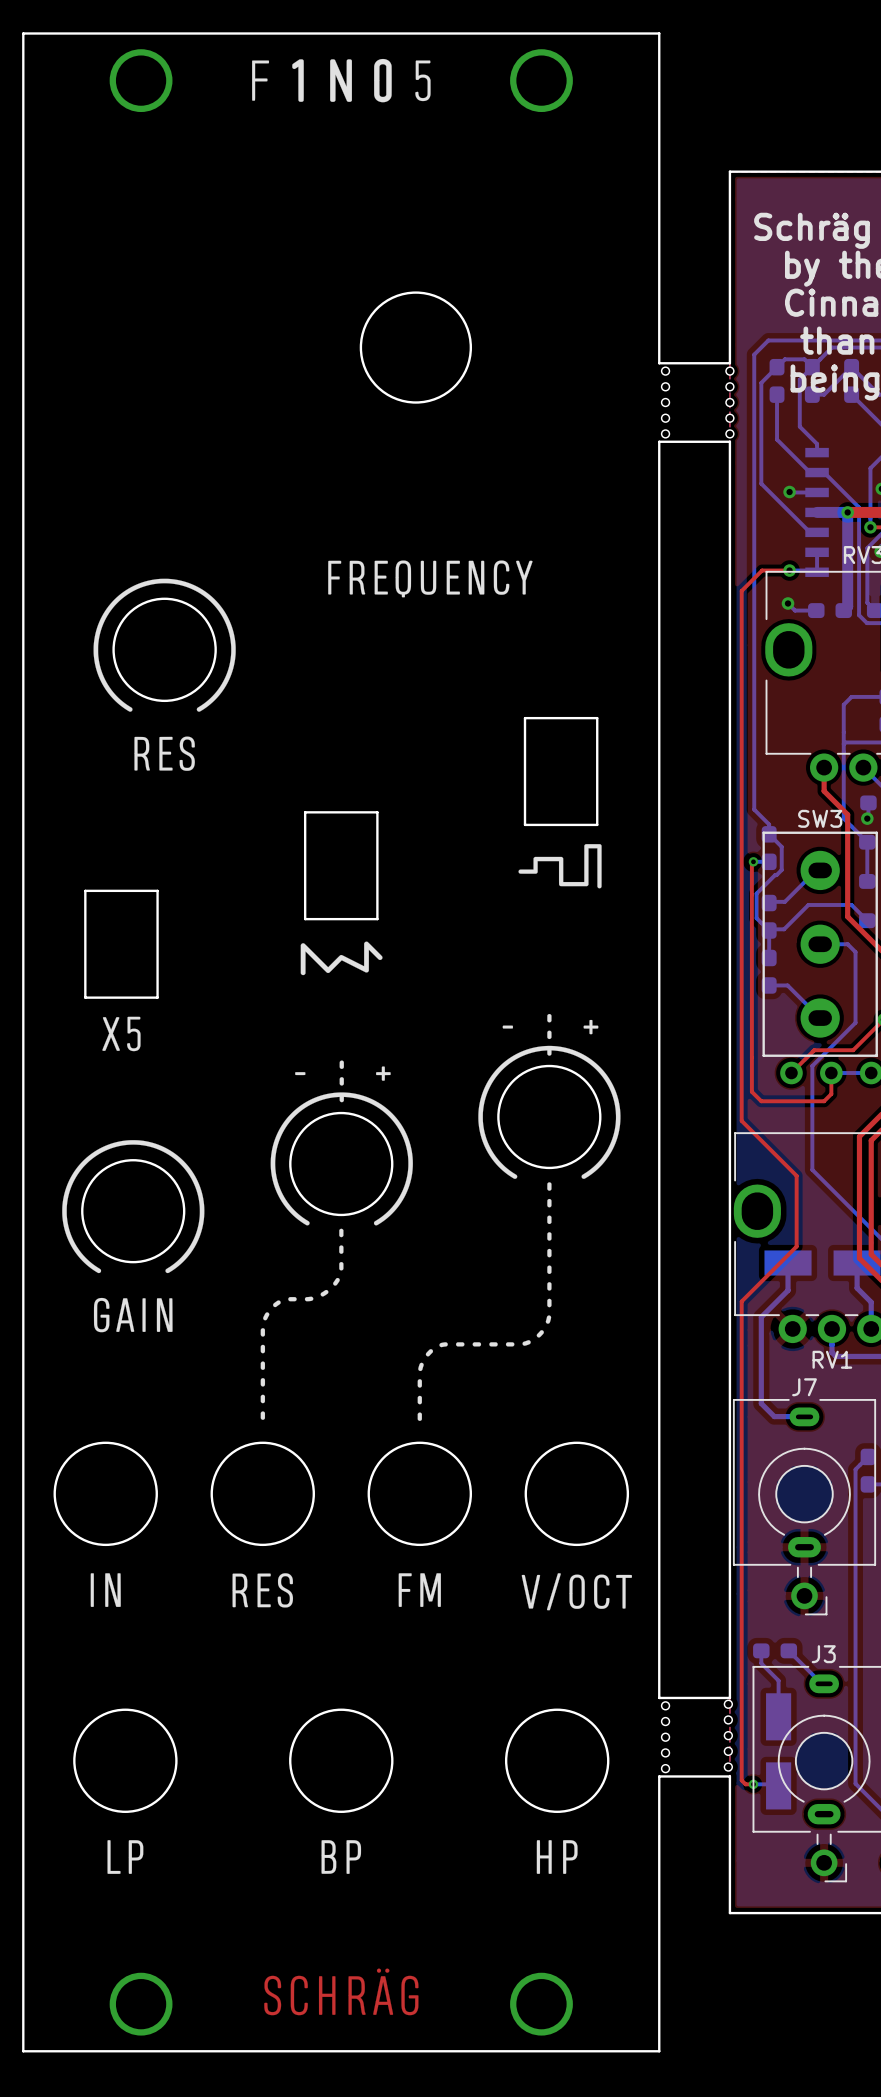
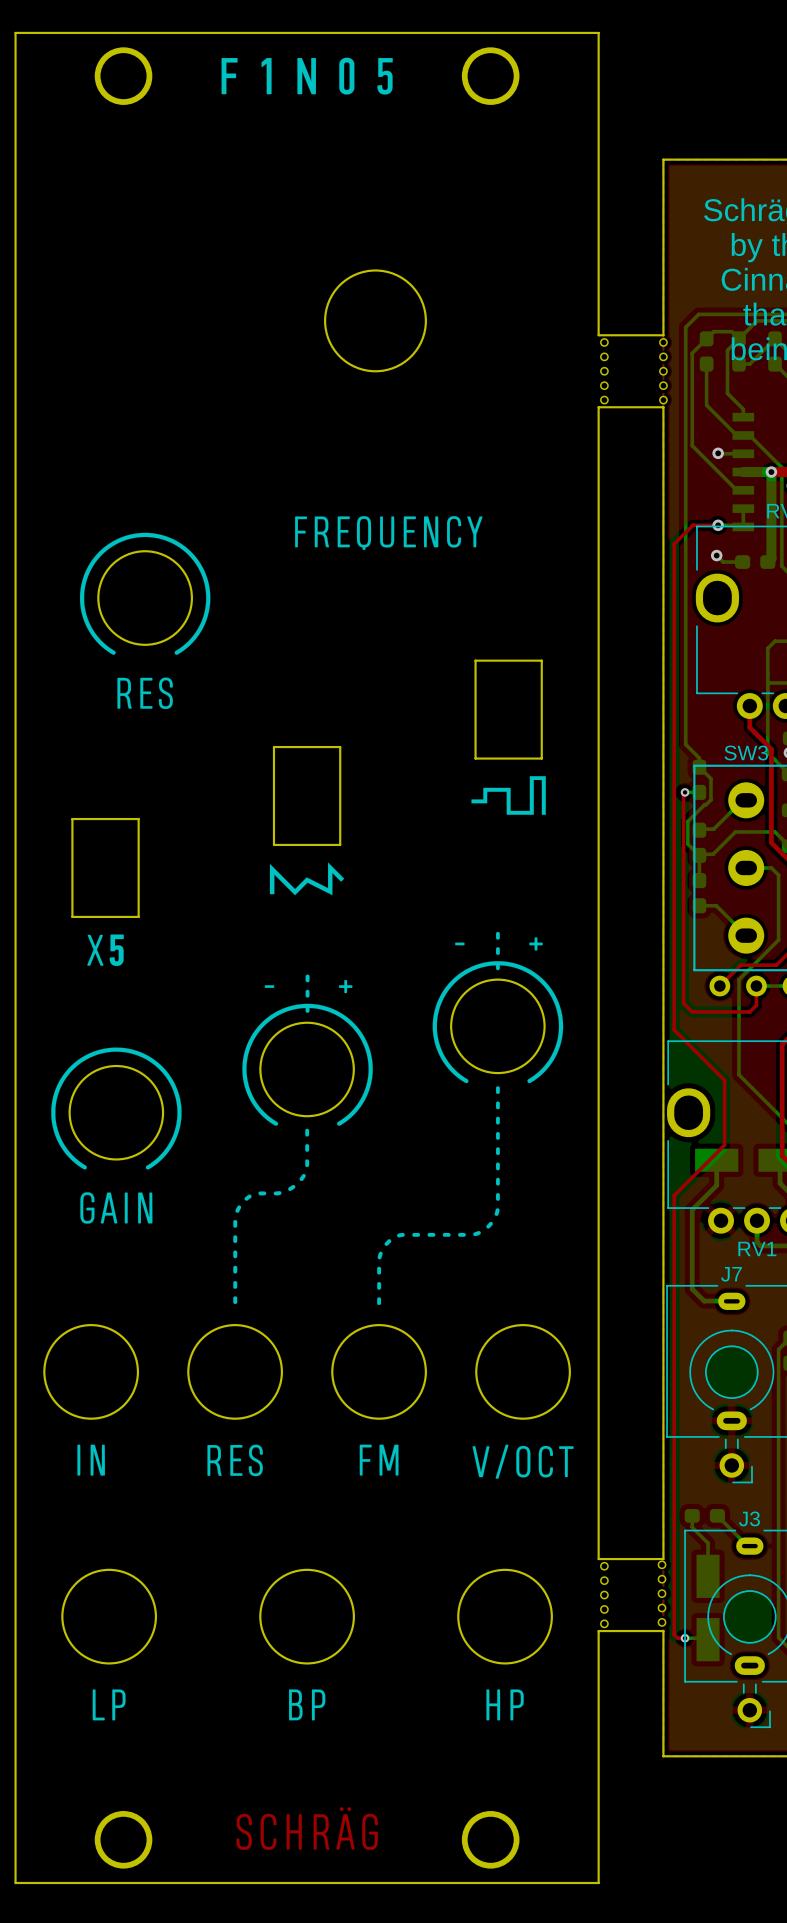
drawing shape: [62, 58, 632, 1874] -> [51, 57, 574, 1721]

